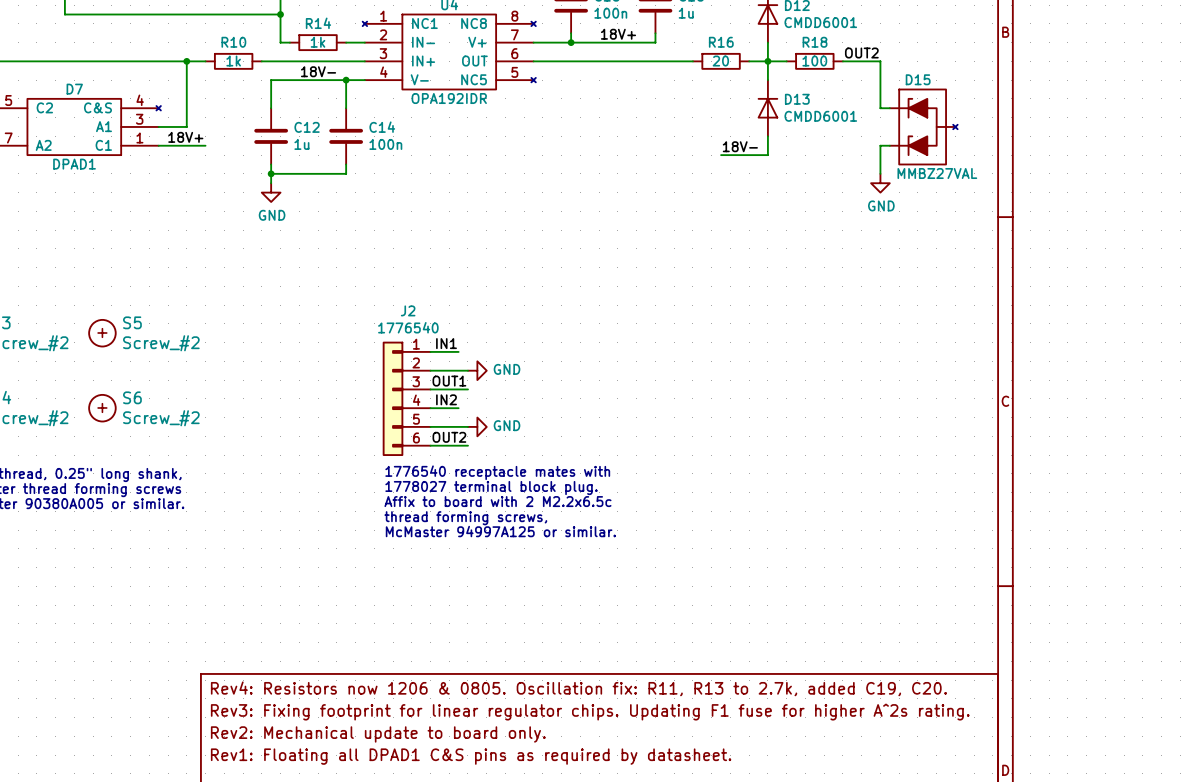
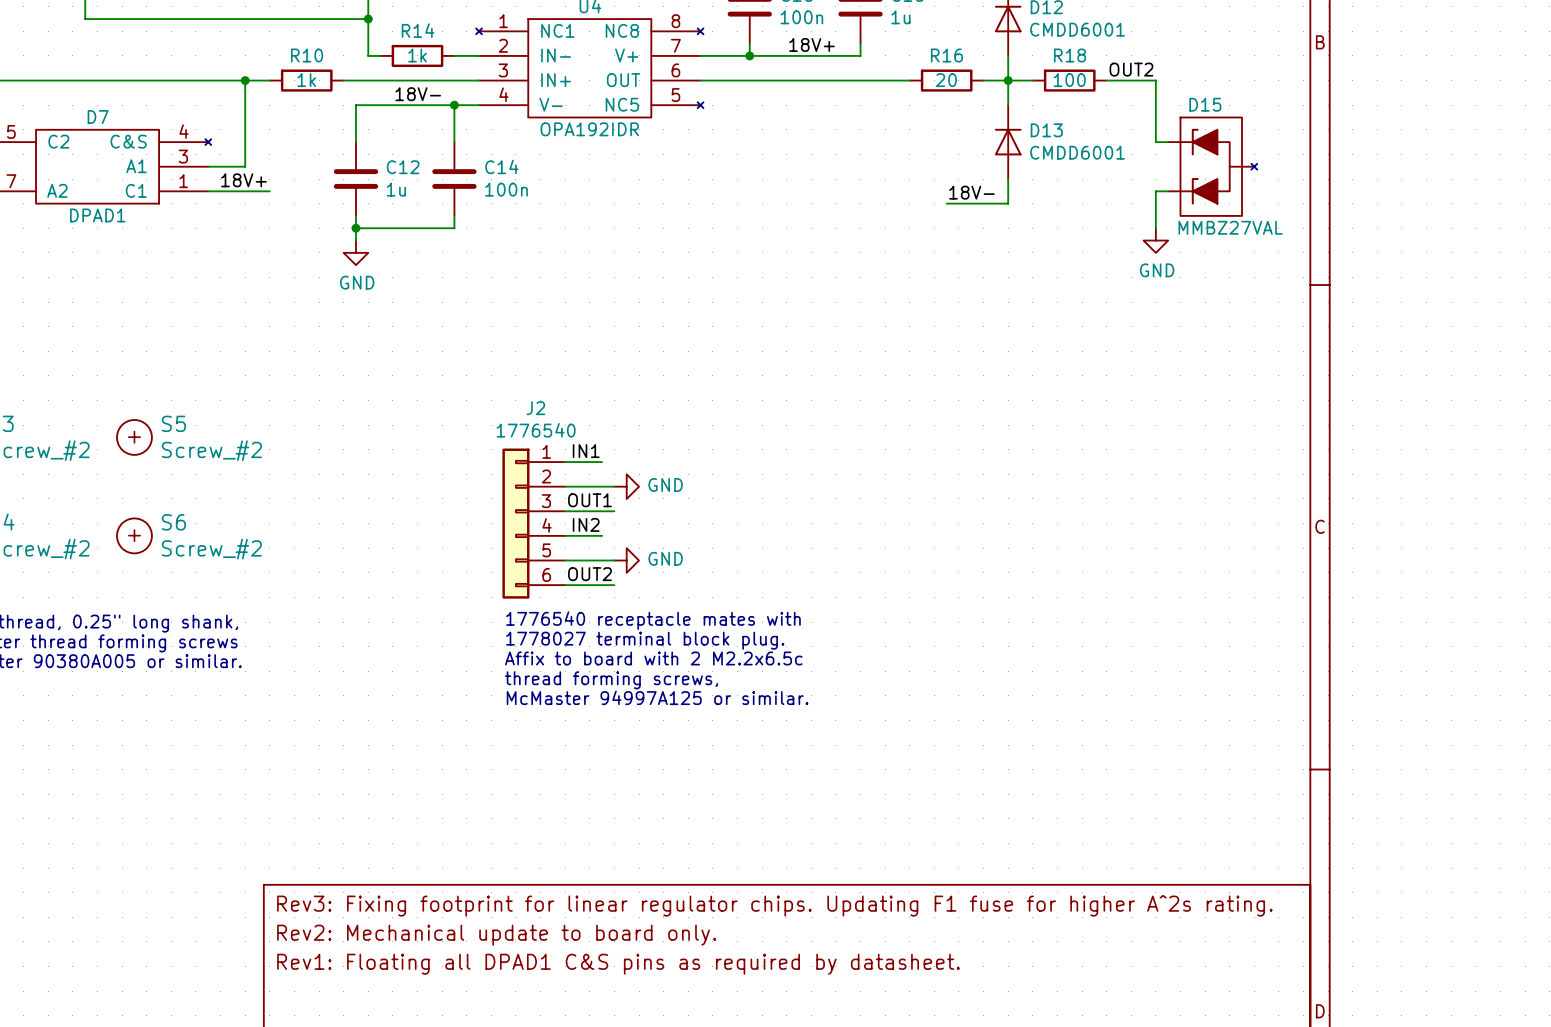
title block: Rev4: Resistors now 1206 & 0805. Oscillation fix: R11, R13 to 2.7k, added C19, C20. (578, 688) -> Rev3: Fixing footprint for linear regulator chips. Updating F1 fuse for higher A^2s rating. (774, 905)
title block: Rev3: Fixing footprint for linear regulator chips. Updating F1 fuse for higher A^2s rating. (590, 712) -> Rev2: Mechanical update to board only. (496, 935)
title block: Rev2: Mechanical update to board only. (378, 734) -> Rev1: Floating all DPAD1 C&S pins as required by datasheet. (618, 964)
title block: Rev1: Floating all DPAD1 C&S pins as required by datasheet. (471, 756) -> none

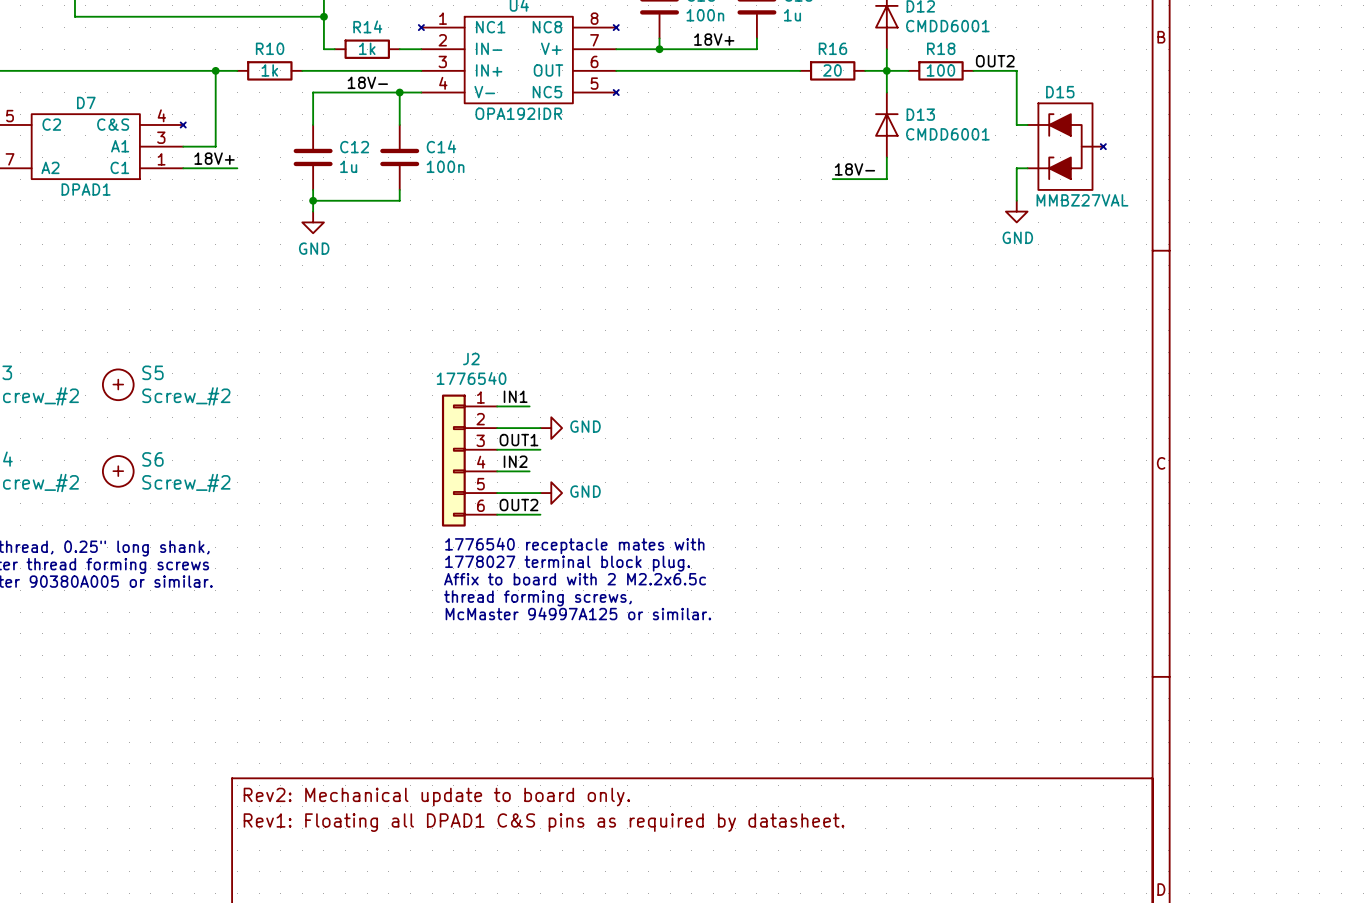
title block: Rev3: Fixing footprint for linear regulator chips. Updating F1 fuse for higher A^2s rating. (774, 905) -> Rev2: Mechanical update to board only. (436, 797)
title block: Rev2: Mechanical update to board only. (496, 935) -> Rev1: Floating all DPAD1 C&S pins as required by datasheet. (544, 822)
title block: Rev1: Floating all DPAD1 C&S pins as required by datasheet. (618, 964) -> none

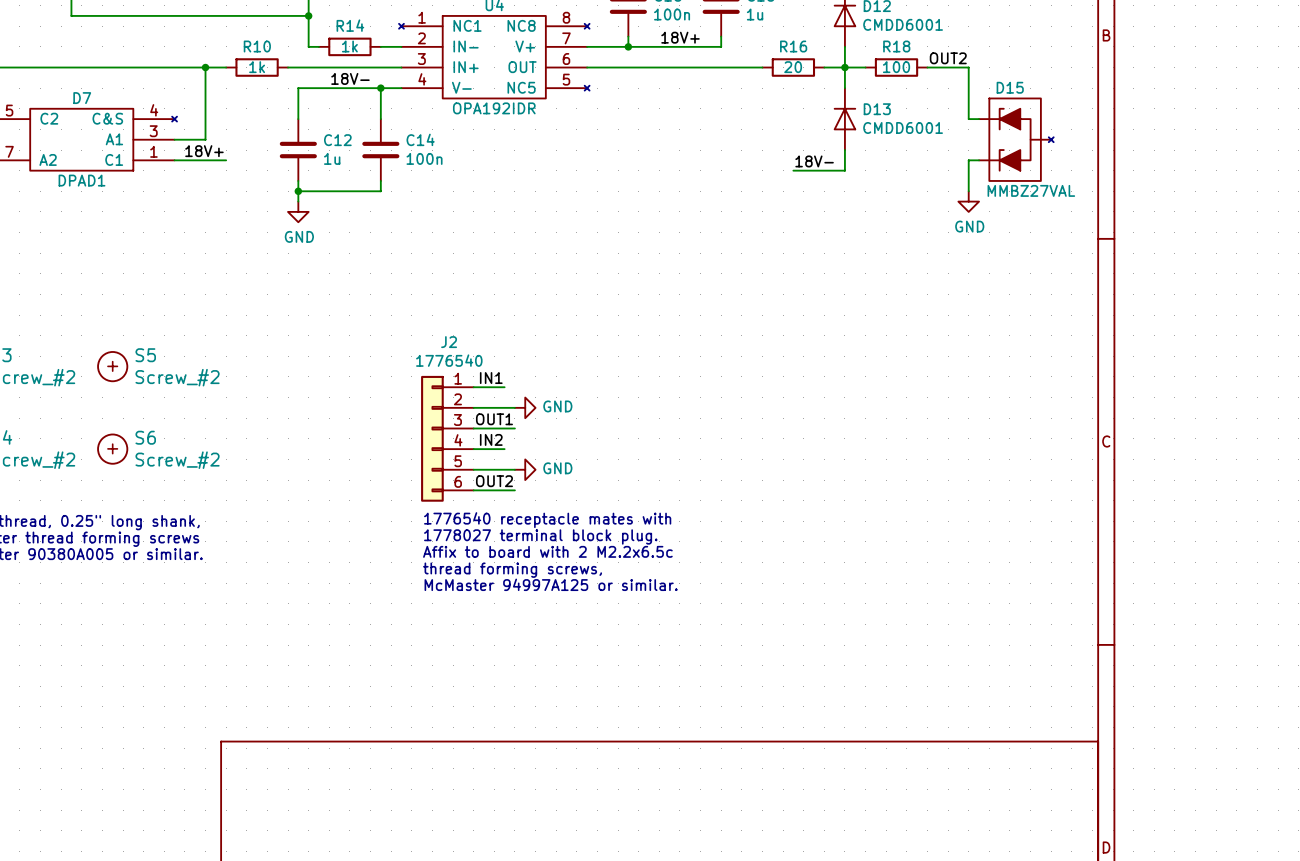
title block: Rev2: Mechanical update to board only. (436, 797) -> none
title block: Rev1: Floating all DPAD1 C&S pins as required by datasheet. (544, 822) -> none

